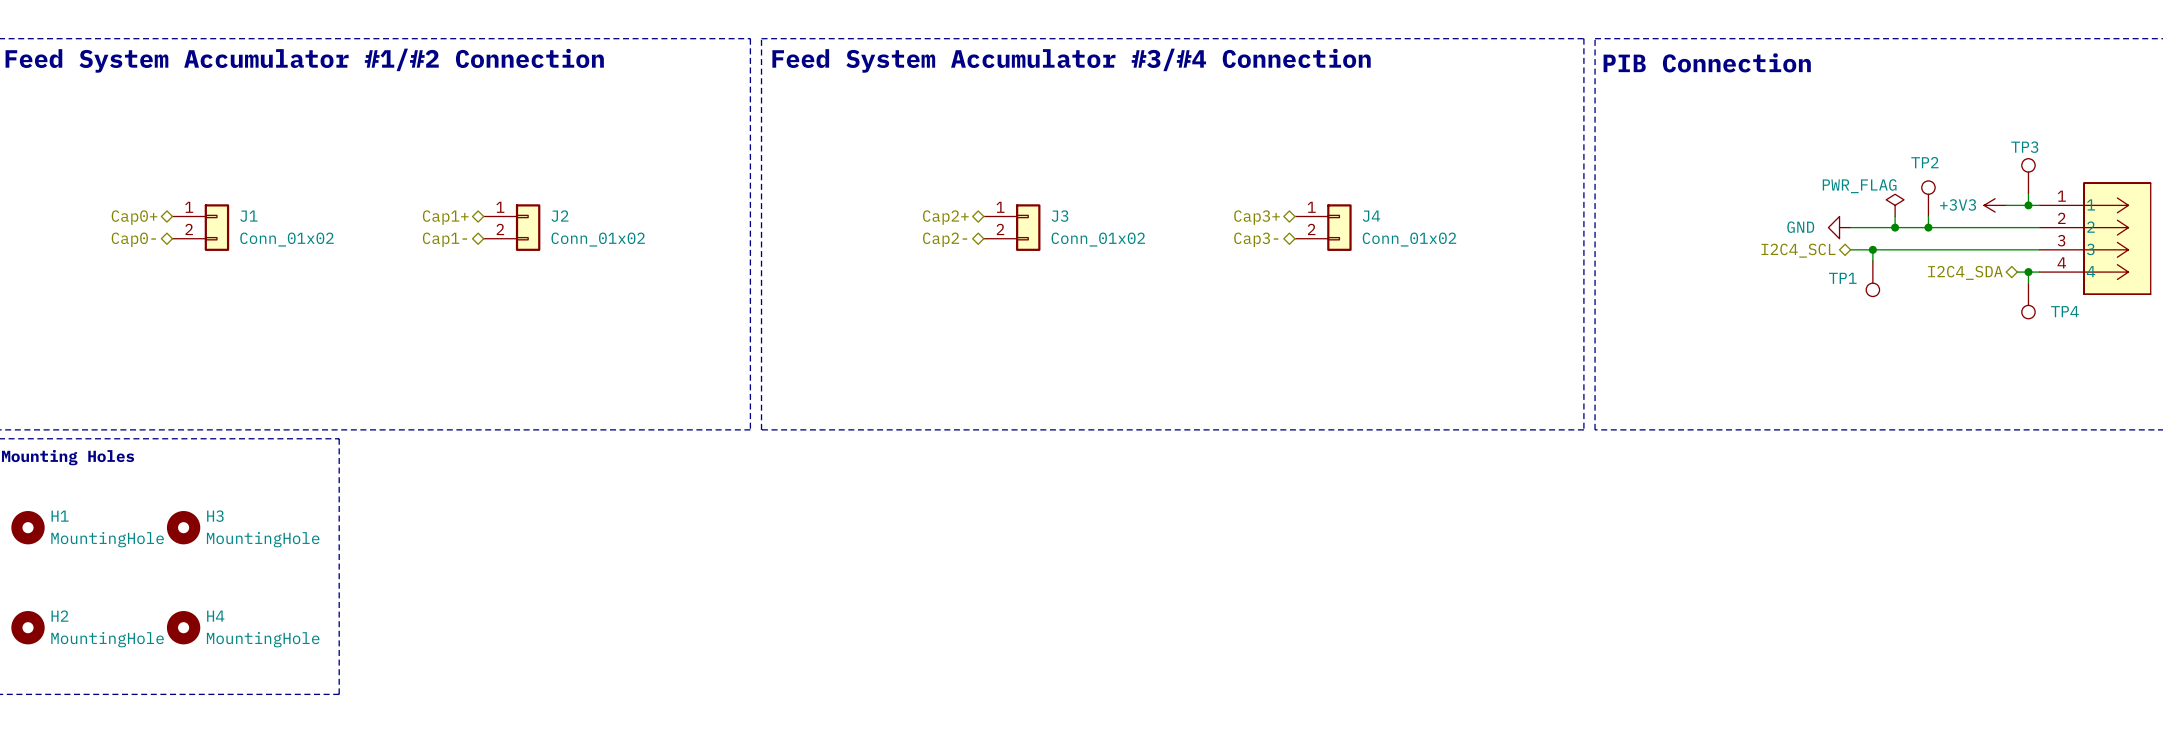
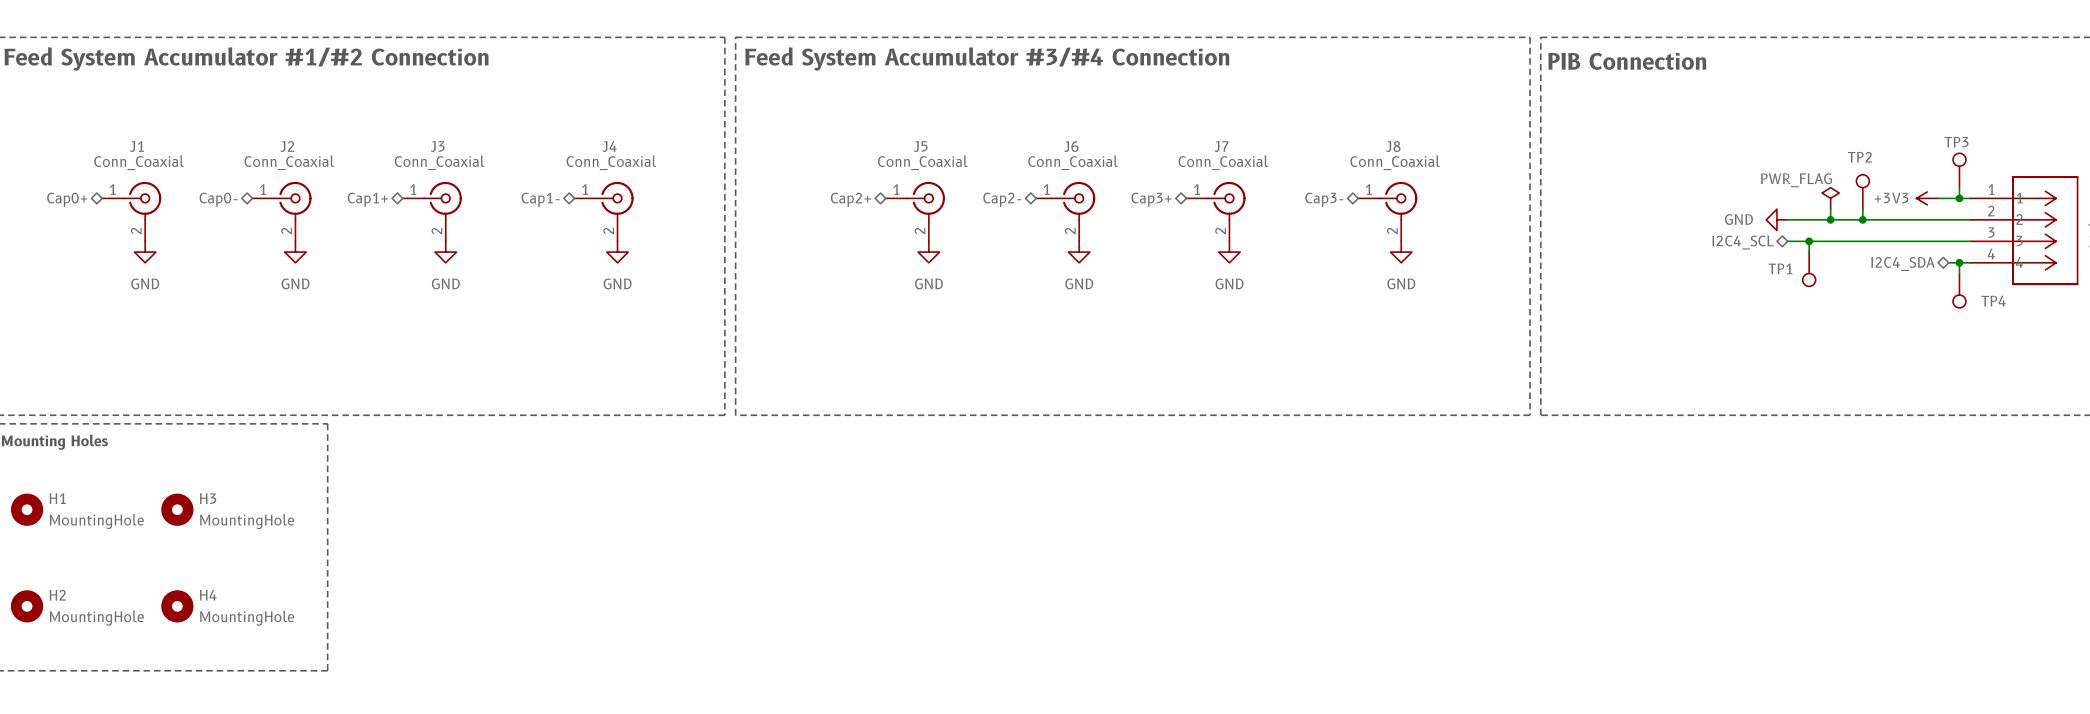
J1 symbol: [172, 204, 230, 251] -> [102, 181, 162, 242]
J2 symbol: [483, 204, 541, 251] -> [252, 181, 312, 242]
J3 symbol: [983, 204, 1041, 251] -> [402, 181, 462, 242]
J4 symbol: [1294, 204, 1352, 251] -> [574, 181, 634, 242]
J1 name position: J1 (248, 216) -> J1 (137, 146)
J2 name position: J2 (559, 216) -> J2 (287, 146)
J3 name position: J3 (1059, 216) -> J3 (437, 146)
J4 name position: J4 (1371, 216) -> J4 (609, 146)
hierarchical label position: Cap0+ (134, 217) -> Cap0+ (67, 199)
hierarchical label position: Cap1+ (445, 217) -> Cap1+ (367, 199)
hierarchical label position: Cap2+ (945, 217) -> Cap2+ (850, 199)
hierarchical label position: Cap3+ (1257, 217) -> Cap3+ (1151, 199)
J5: none -> Conn_Coaxial (915, 211)
J6: none -> Conn_Coaxial (1065, 211)
J7: none -> Conn_Coaxial (1216, 211)
J8: none -> Conn_Coaxial (1387, 211)
hierarchical label position: Cap0- (133, 239) -> Cap0- (218, 199)
J1 value: Conn_01x02 (286, 239) -> Conn_Coaxial (139, 162)
hierarchical label position: Cap1- (444, 239) -> Cap1- (540, 199)
J2 value: Conn_01x02 (598, 239) -> Conn_Coaxial (289, 162)
hierarchical label position: Cap2- (945, 239) -> Cap2- (1002, 199)
J3 value: Conn_01x02 (1098, 239) -> Conn_Coaxial (439, 162)
hierarchical label position: Cap3- (1256, 239) -> Cap3- (1324, 199)
J4 value: Conn_01x02 (1409, 239) -> Conn_Coaxial (611, 162)
power symbol: none -> GND (145, 252)
power symbol: none -> GND (295, 252)
power symbol: none -> GND (445, 252)
power symbol: none -> GND (617, 252)
power symbol: none -> GND (928, 252)
power symbol: none -> GND (1079, 252)
power symbol: none -> GND (1229, 252)
power symbol: none -> GND (1401, 252)

